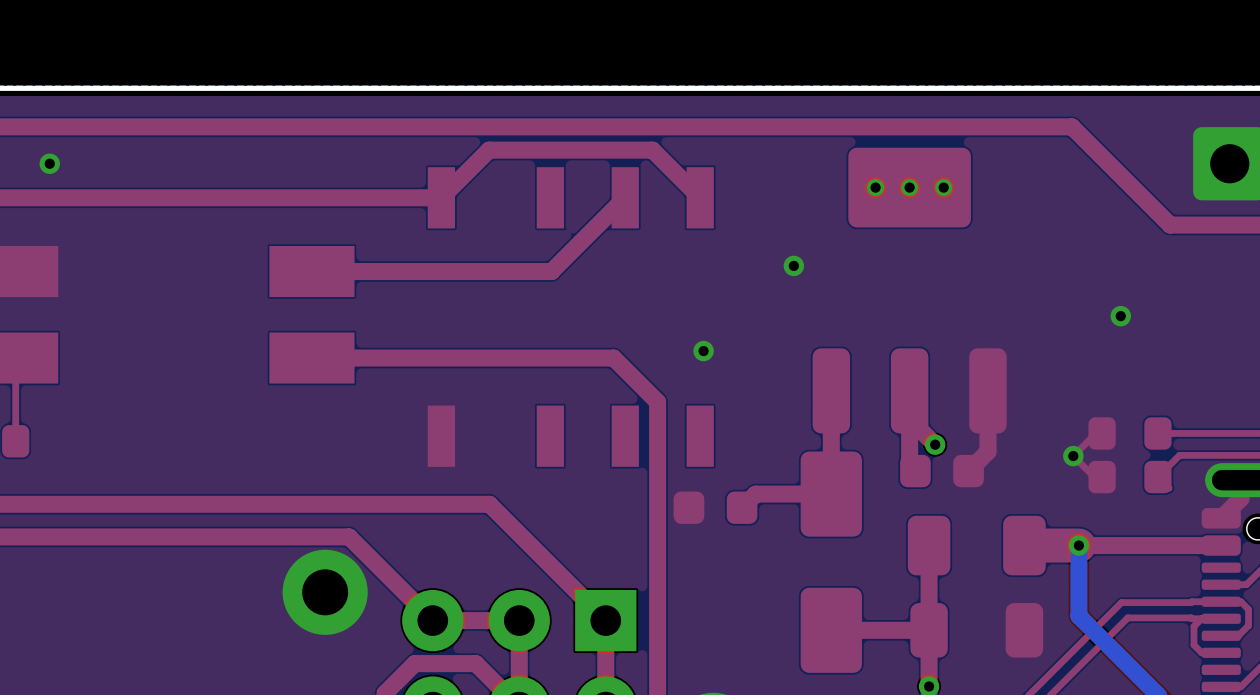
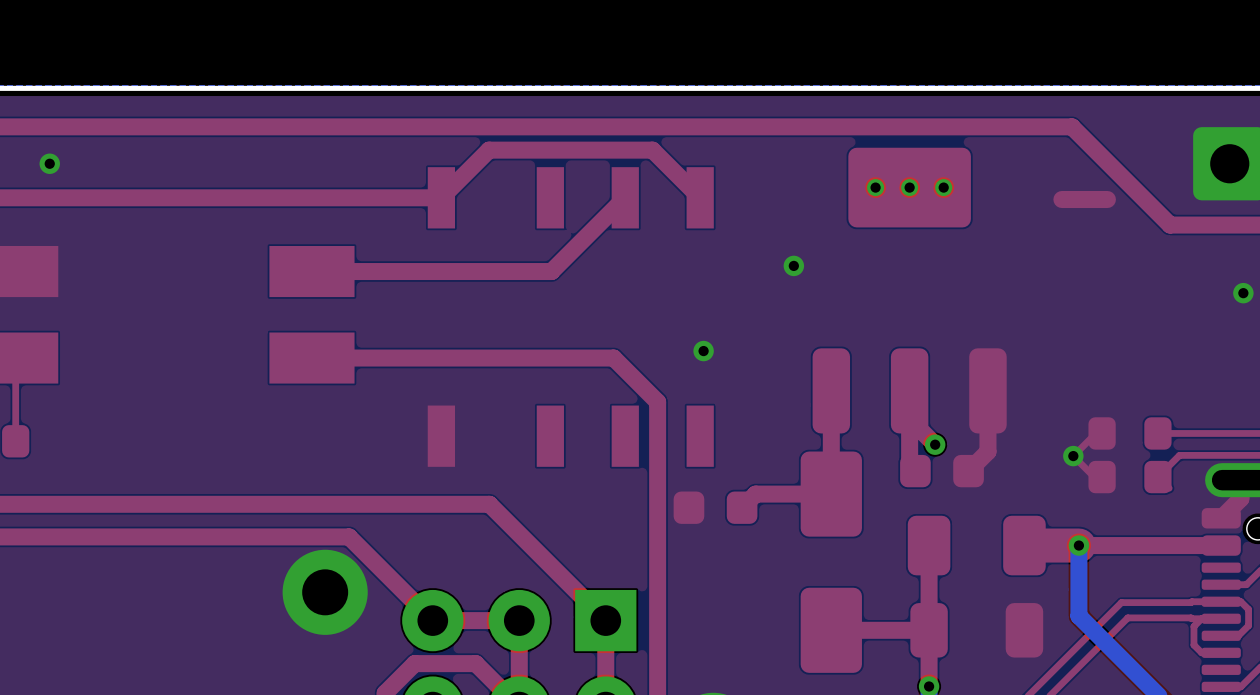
top track: none -> (1107, 199) (1061, 199)
via position: (1120, 316) -> (1243, 293)

